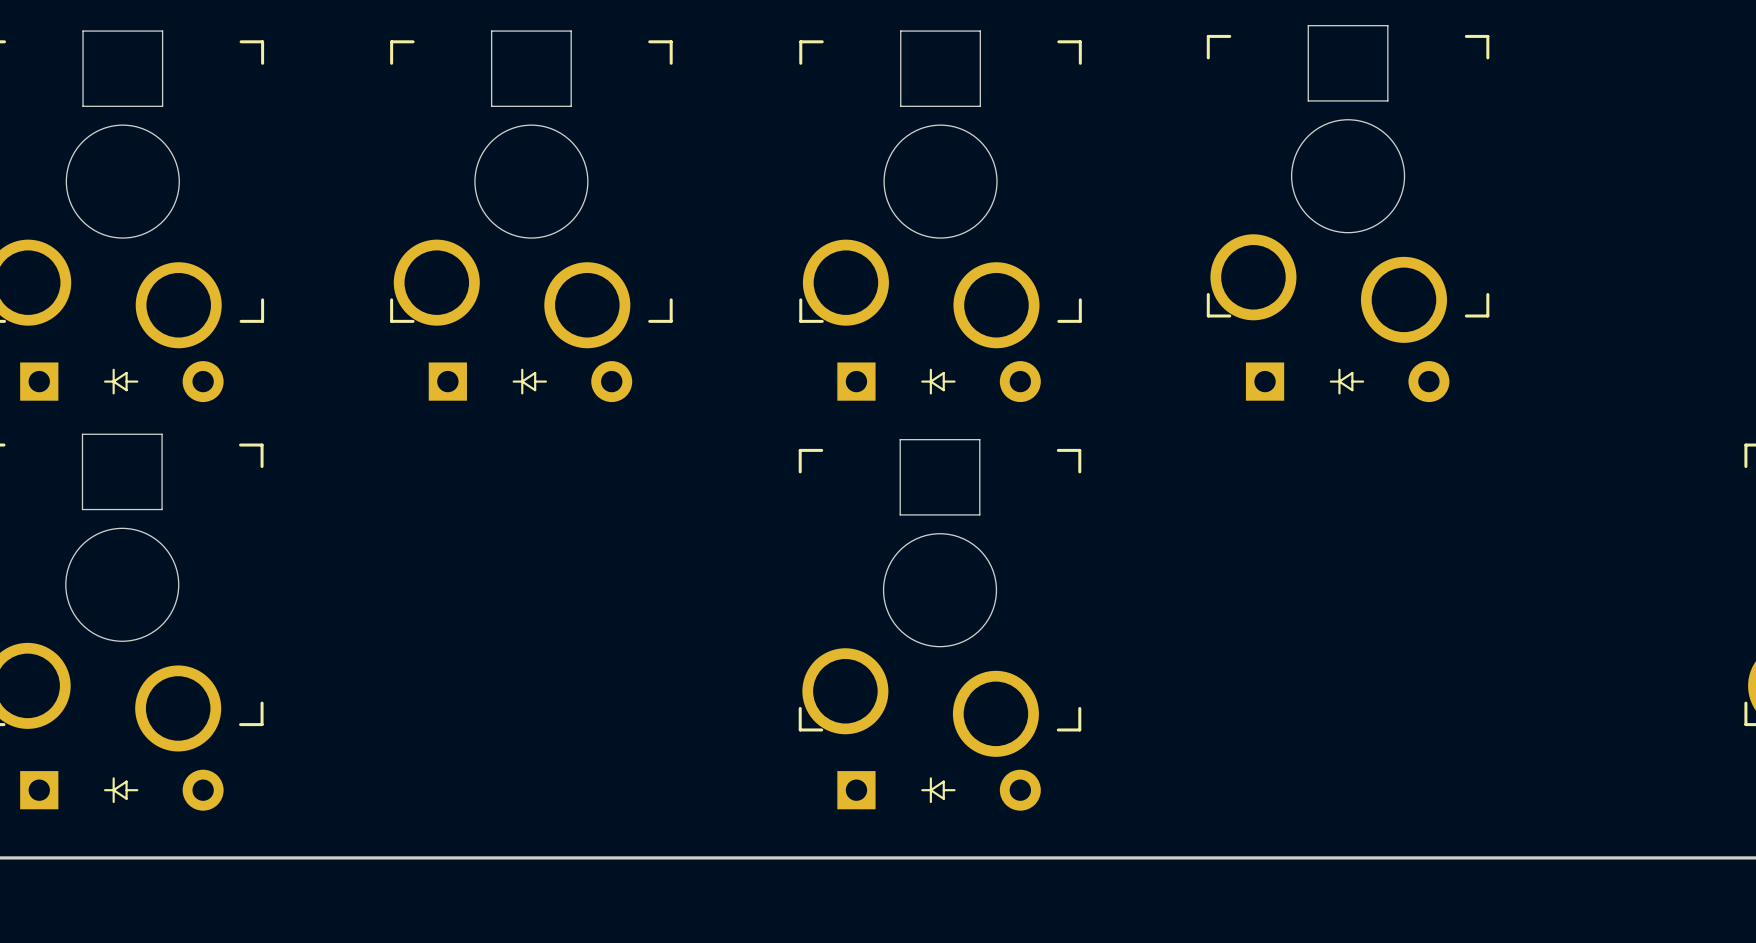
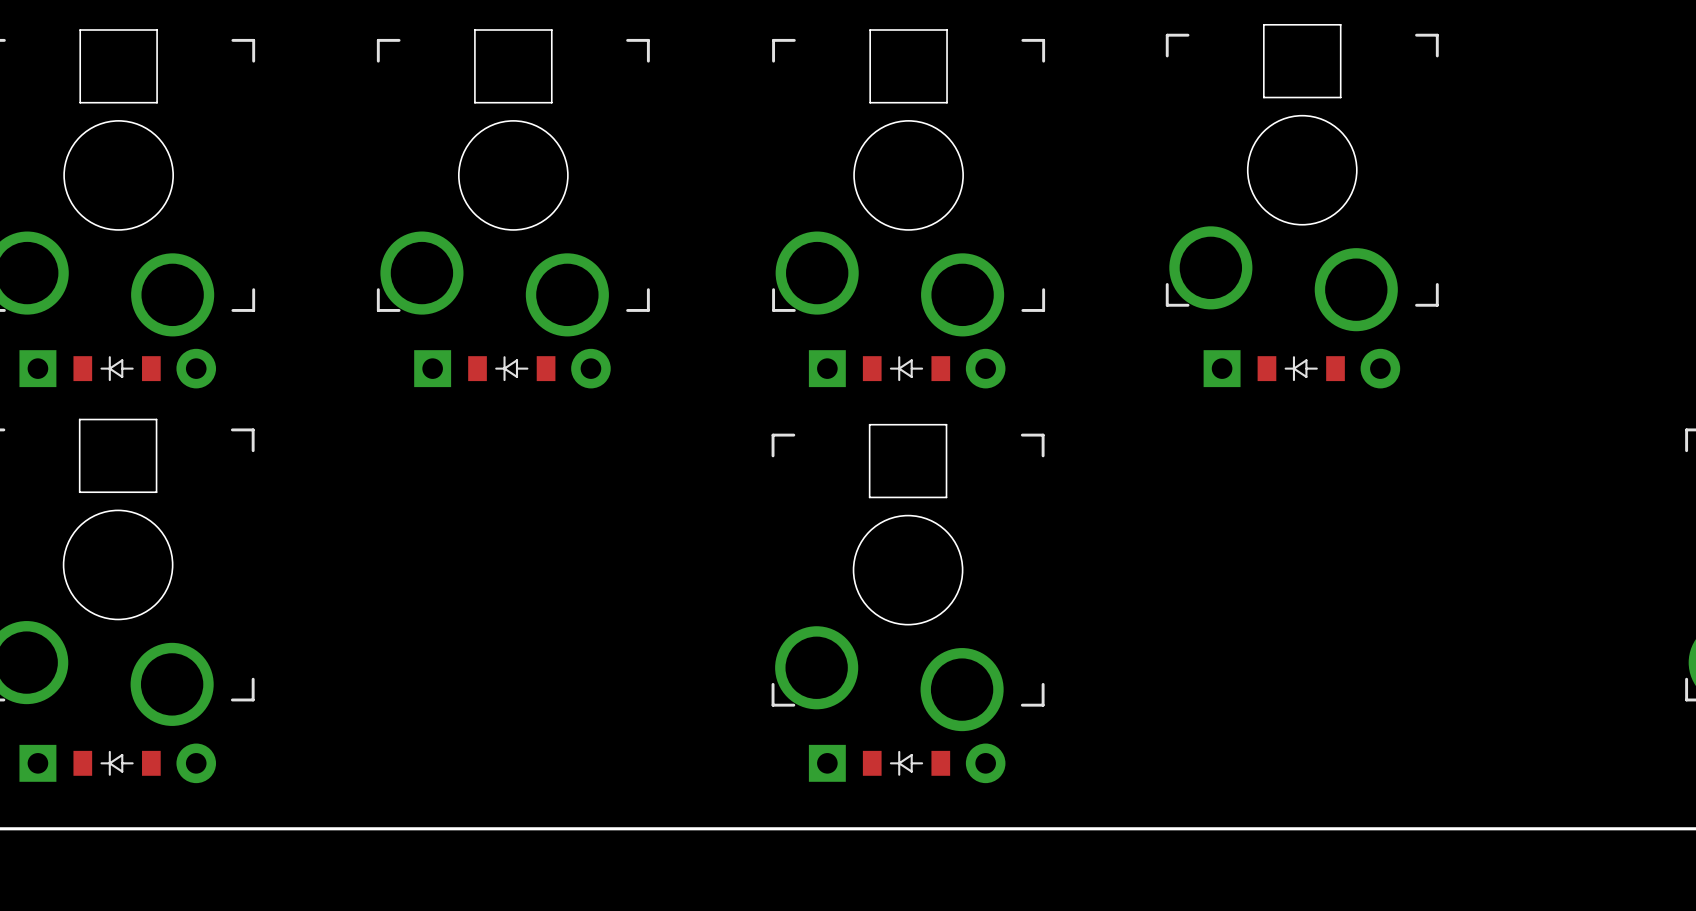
part footprint: [20, 361, 224, 403] -> [19, 348, 217, 389]
part footprint: [428, 361, 633, 403] -> [414, 348, 611, 389]
part footprint: [837, 361, 1041, 403] -> [808, 348, 1006, 389]
part footprint: [1245, 361, 1450, 403] -> [1203, 348, 1401, 389]
part footprint: [20, 769, 224, 811] -> [19, 743, 217, 784]
part footprint: [837, 769, 1041, 811] -> [808, 743, 1006, 784]

